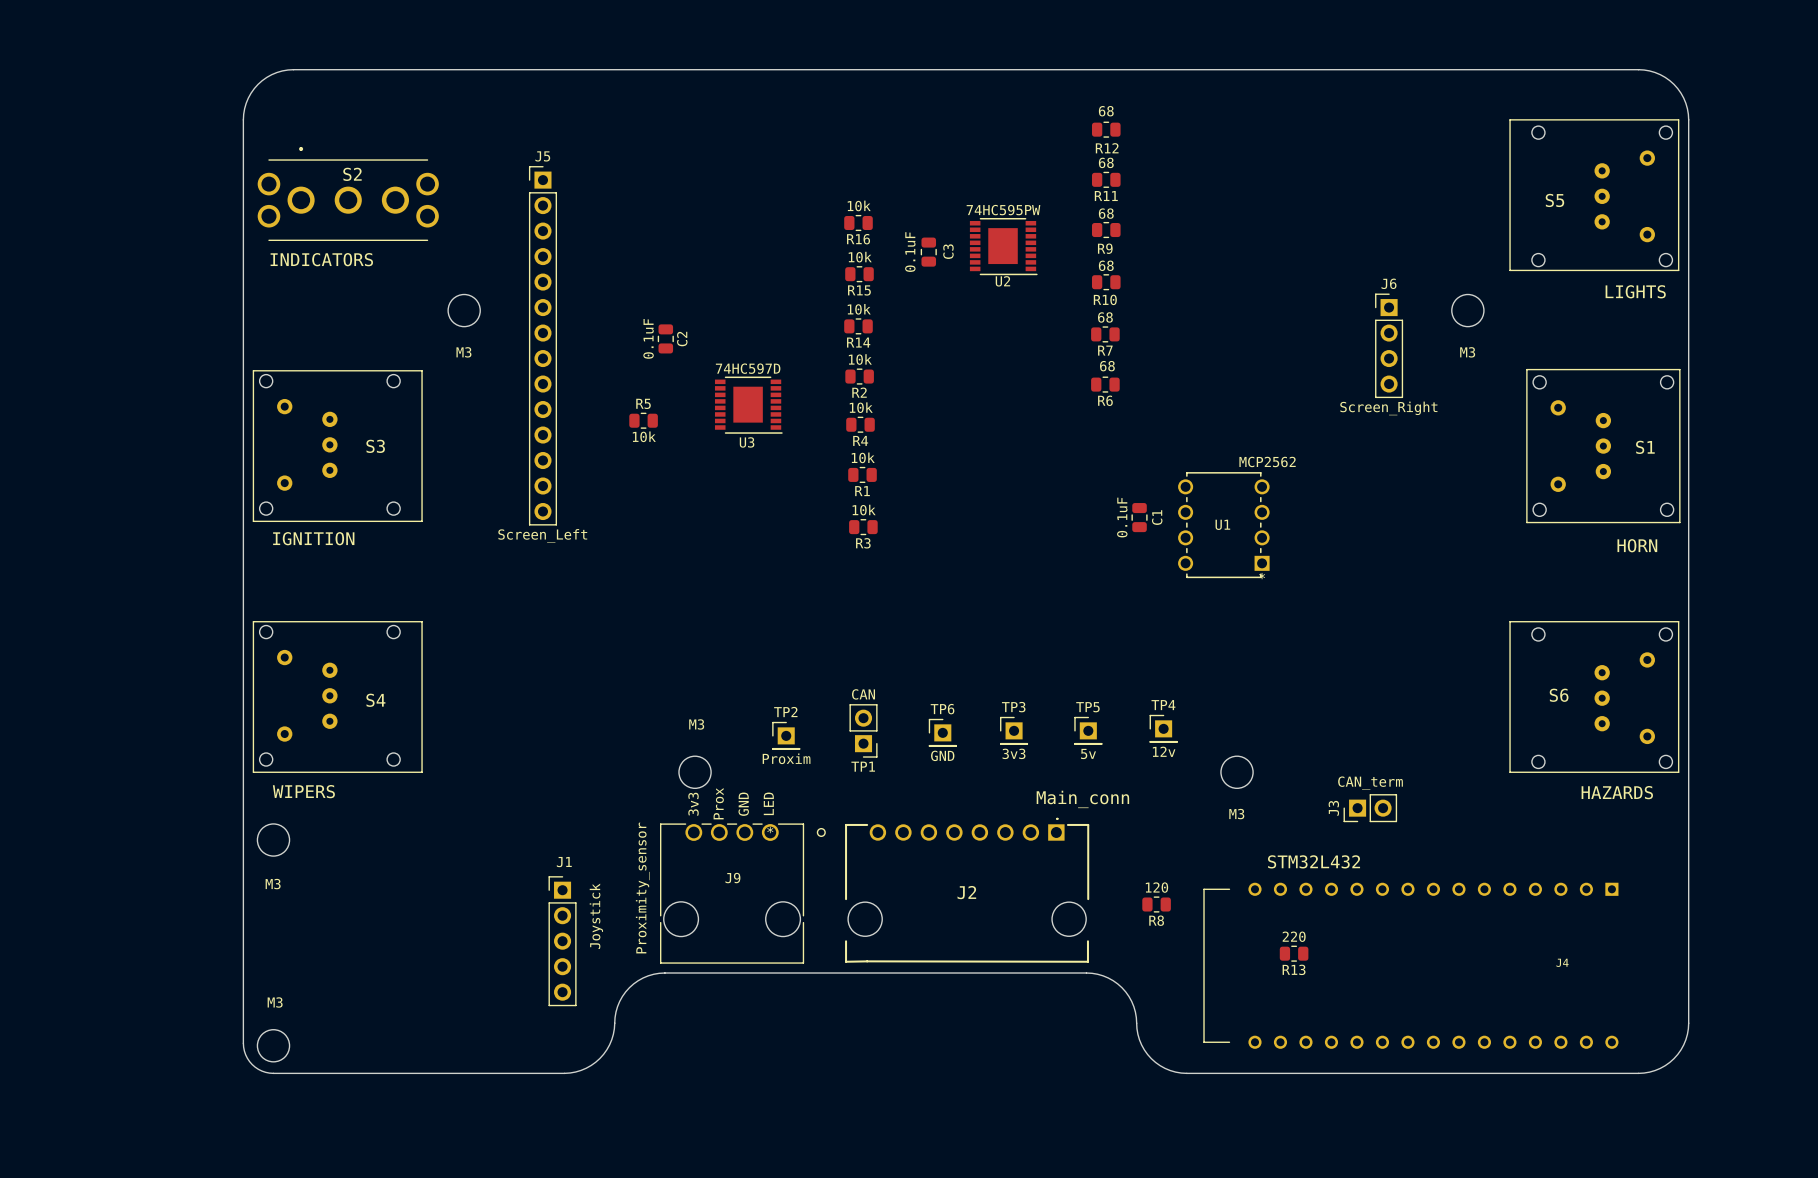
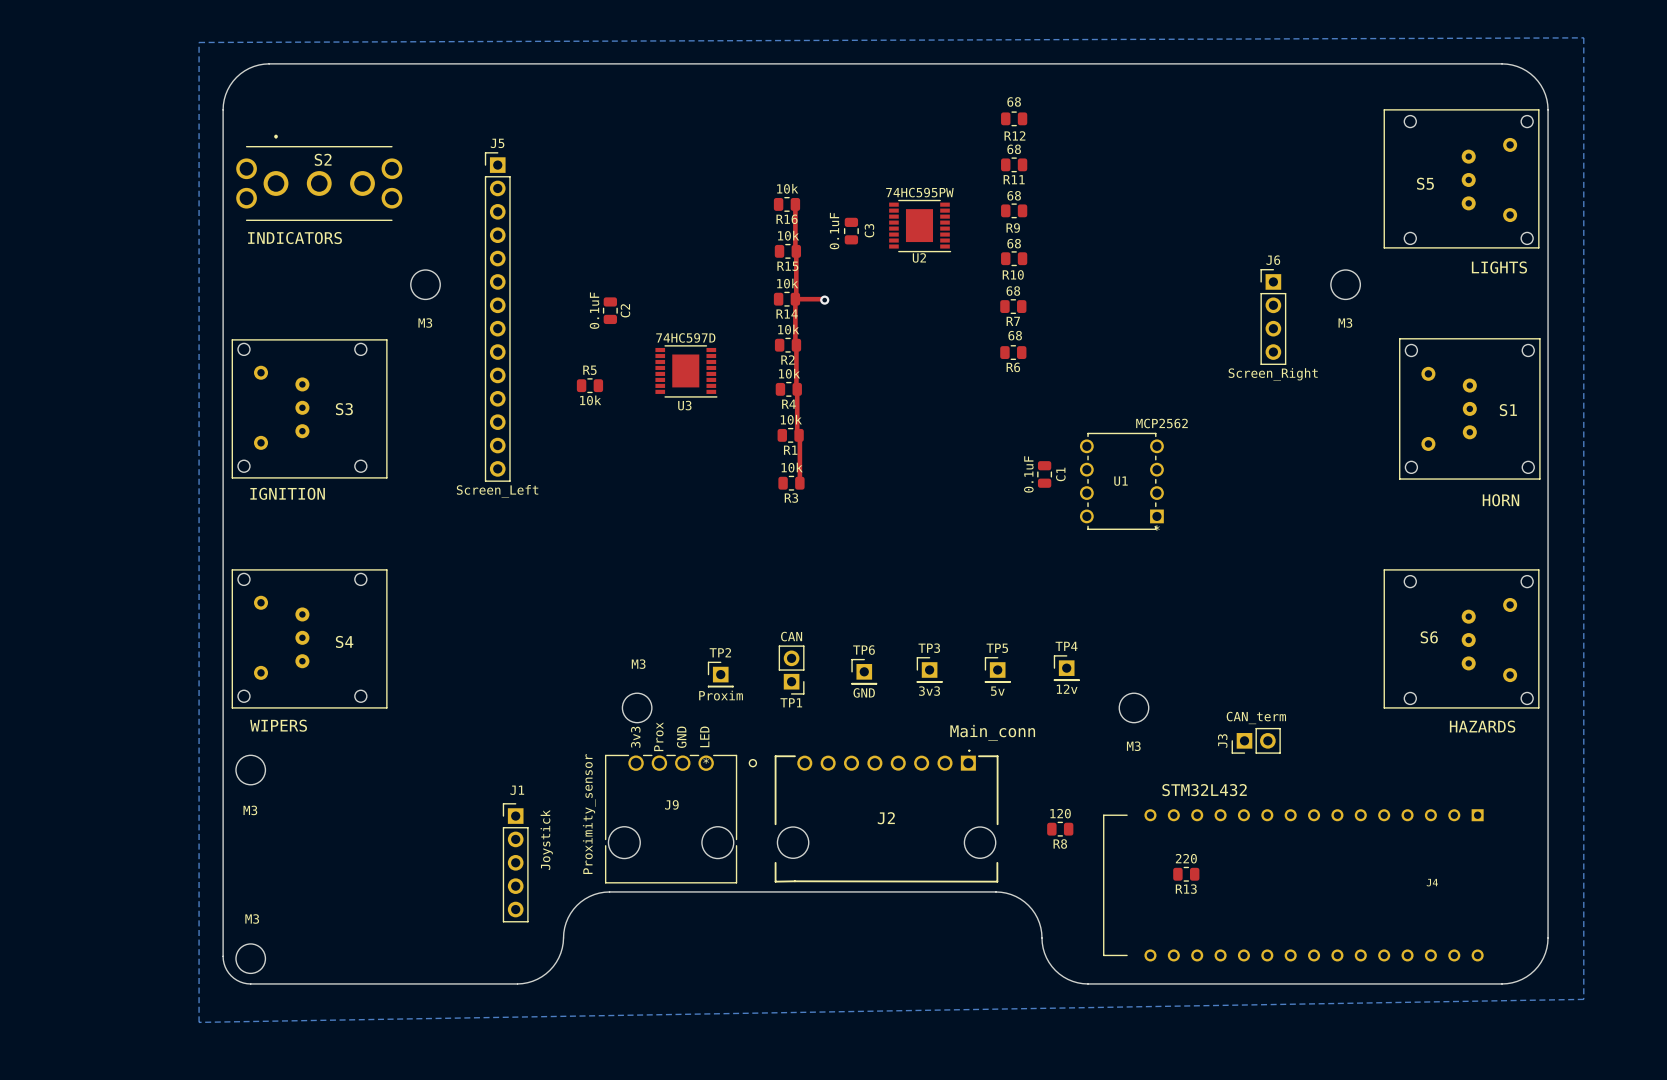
bottom zone outline: none -> (1583, 37) (199, 42) (199, 1022) (1583, 999) (1583, 37)
top track: none -> (795, 204) (795, 299)
top track: none -> (795, 299) (824, 300)
top track: none -> (795, 299) (799, 483)
via: none -> (824, 300)

